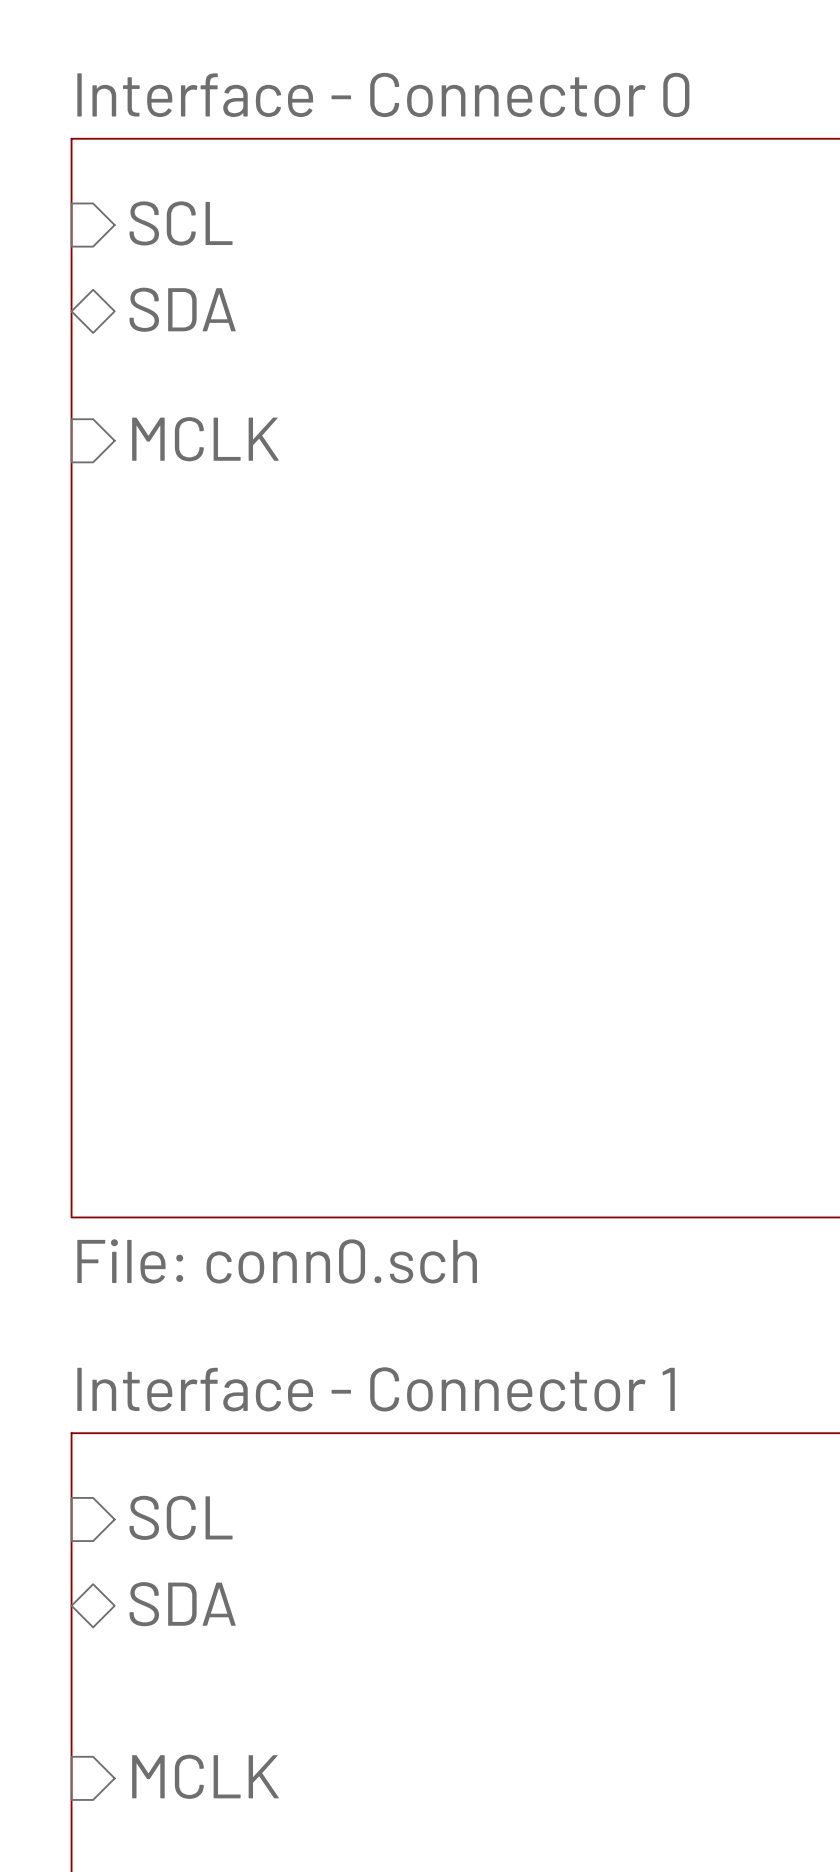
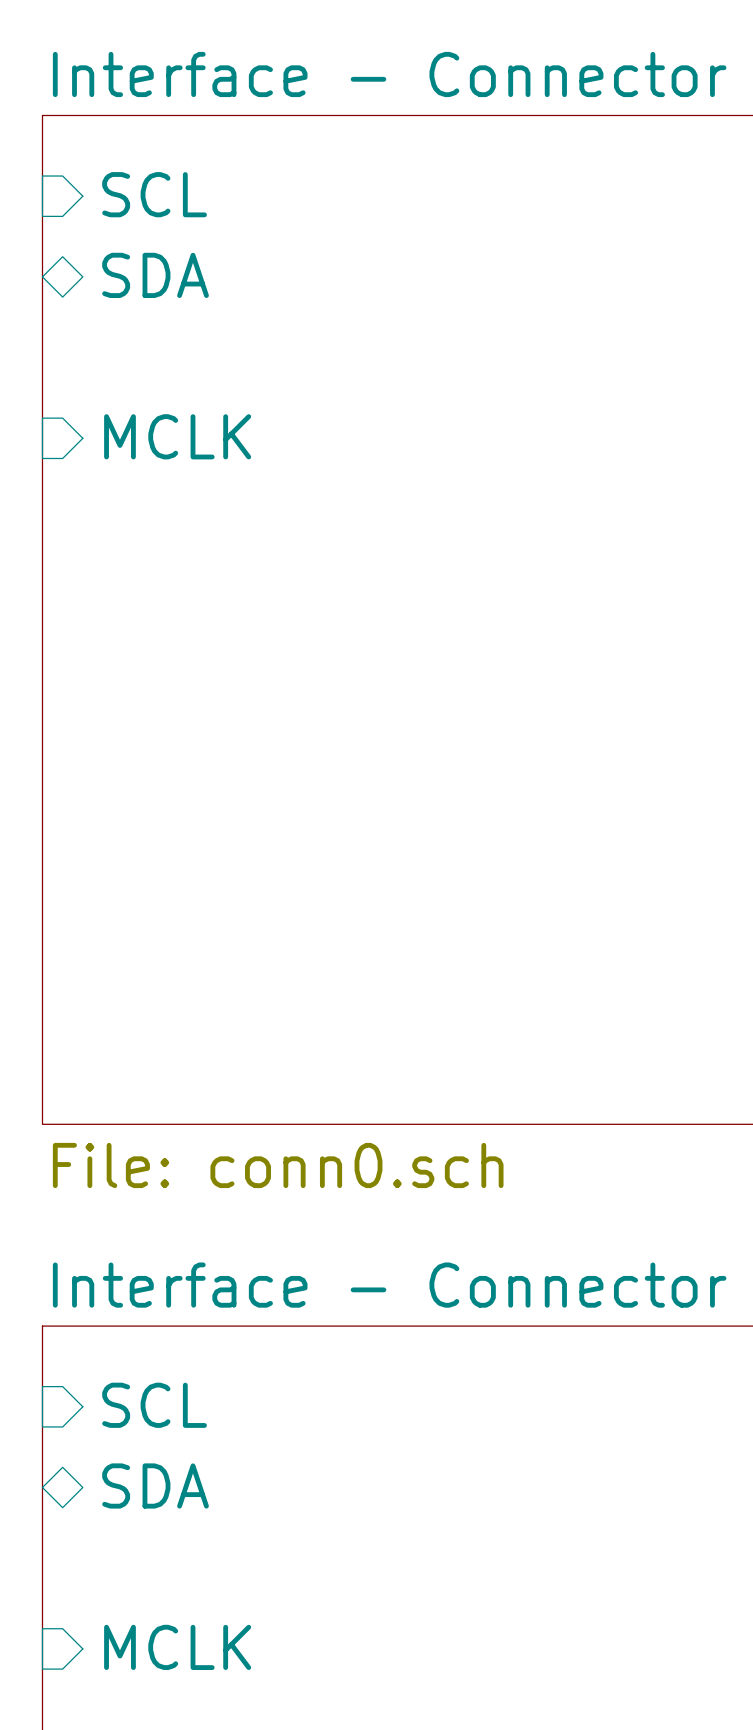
sheet pin position: MCLK (205, 439) -> MCLK (177, 436)

